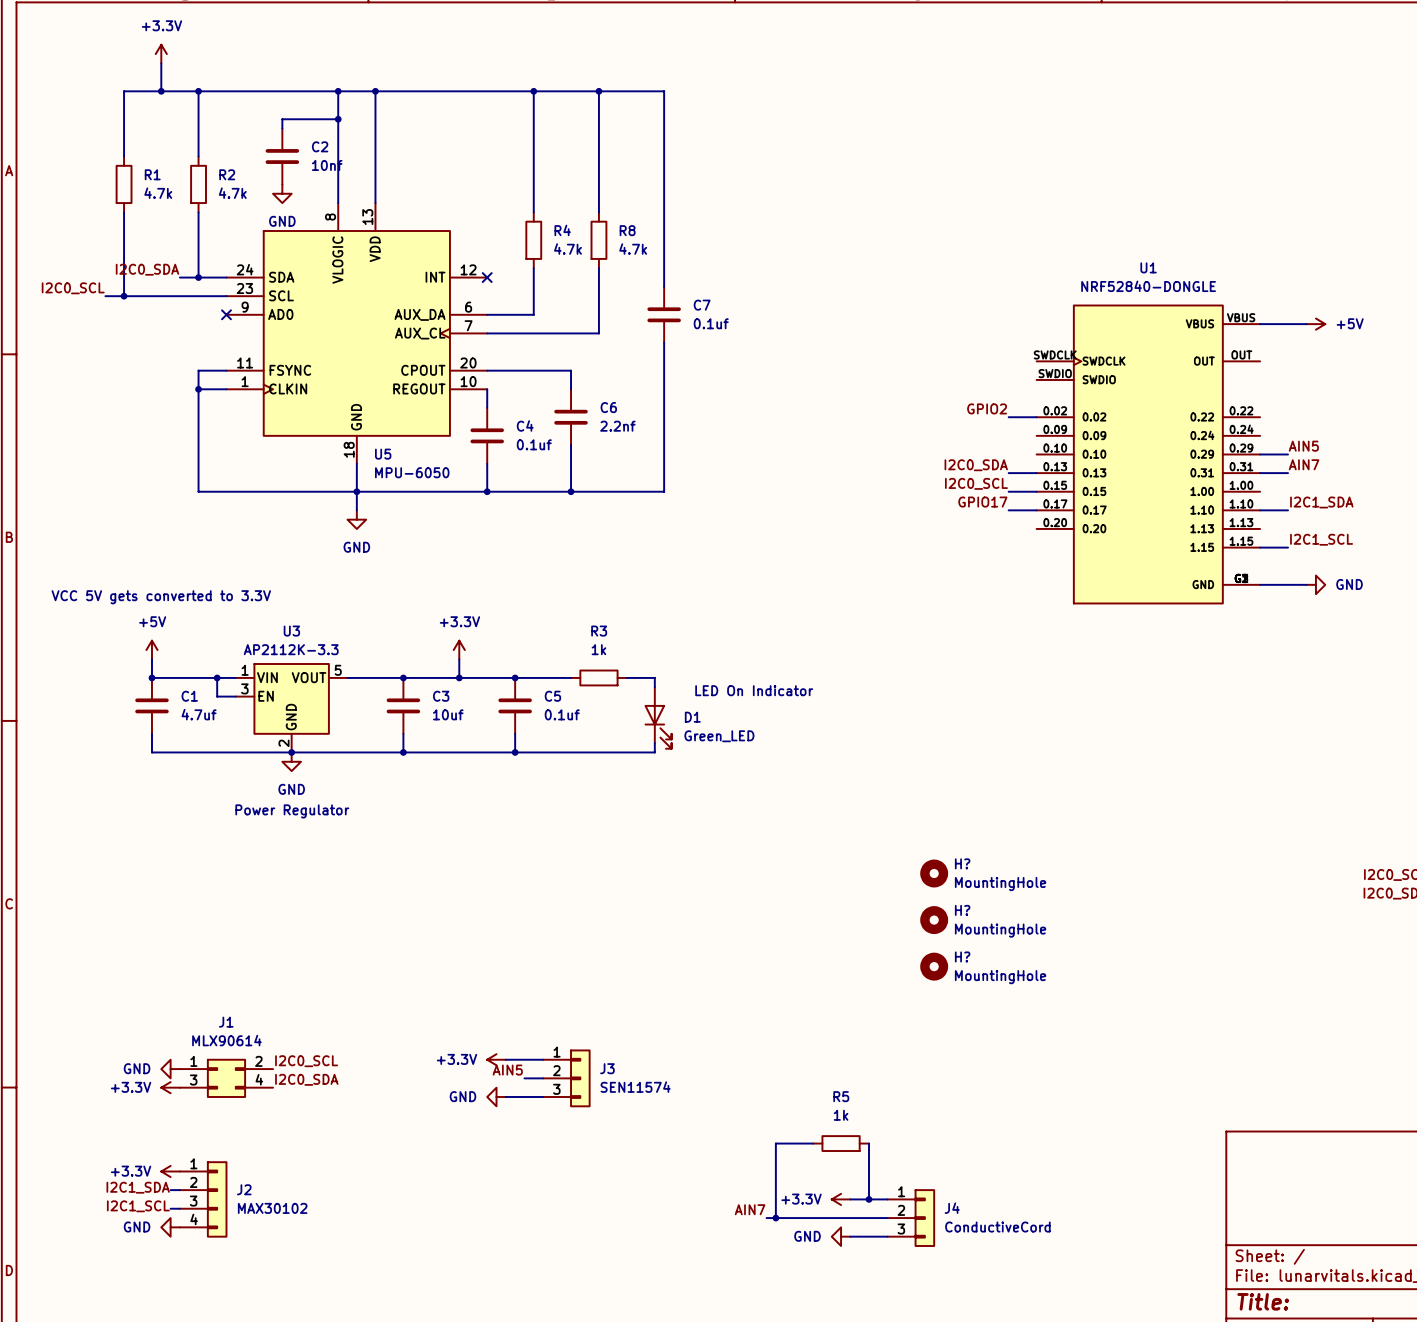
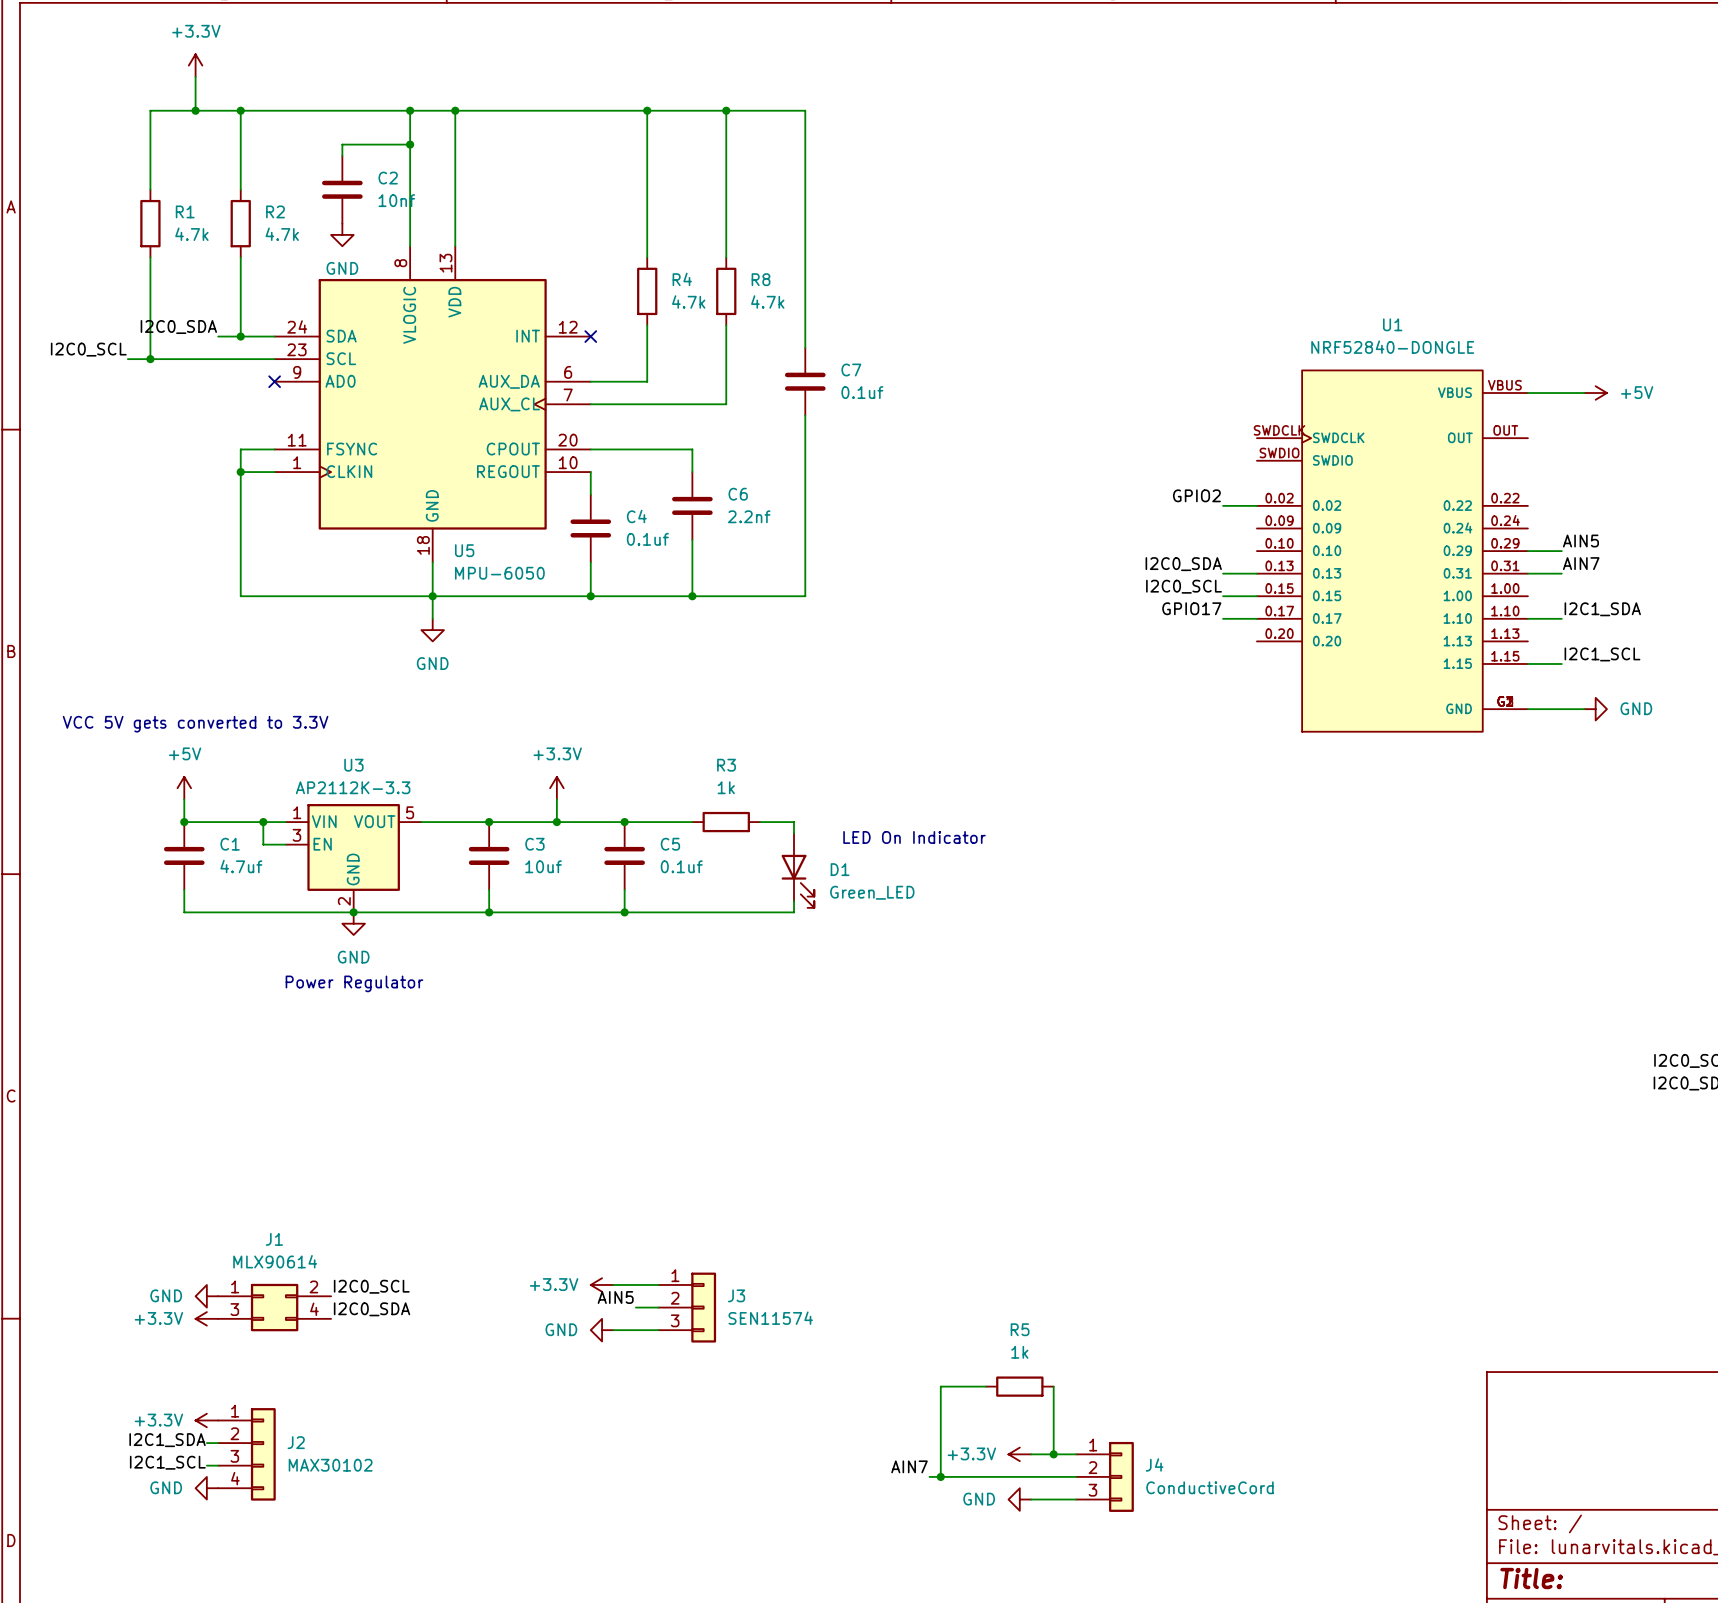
H?: MountingHole (934, 873) -> none
H?: MountingHole (934, 920) -> none
H?: MountingHole (934, 966) -> none

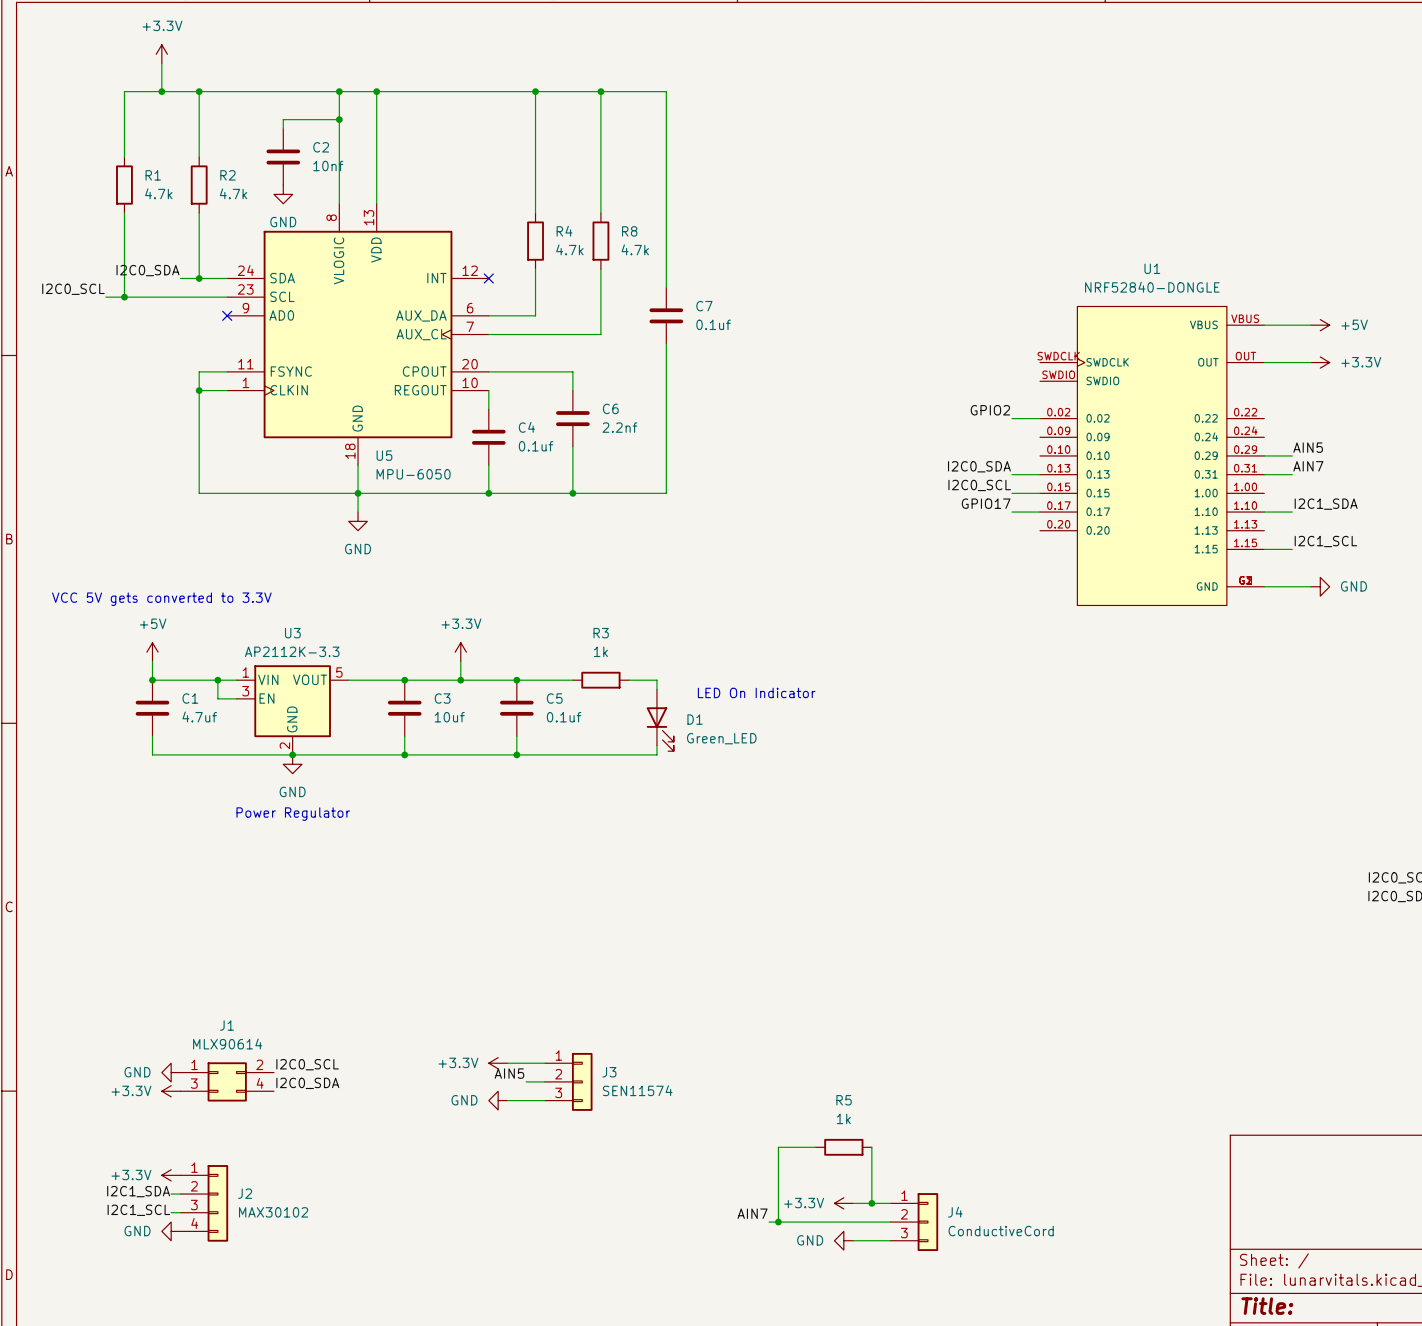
wire: none -> (1264, 362) (1310, 362)
power symbol: none -> +3.3V (1320, 362)

